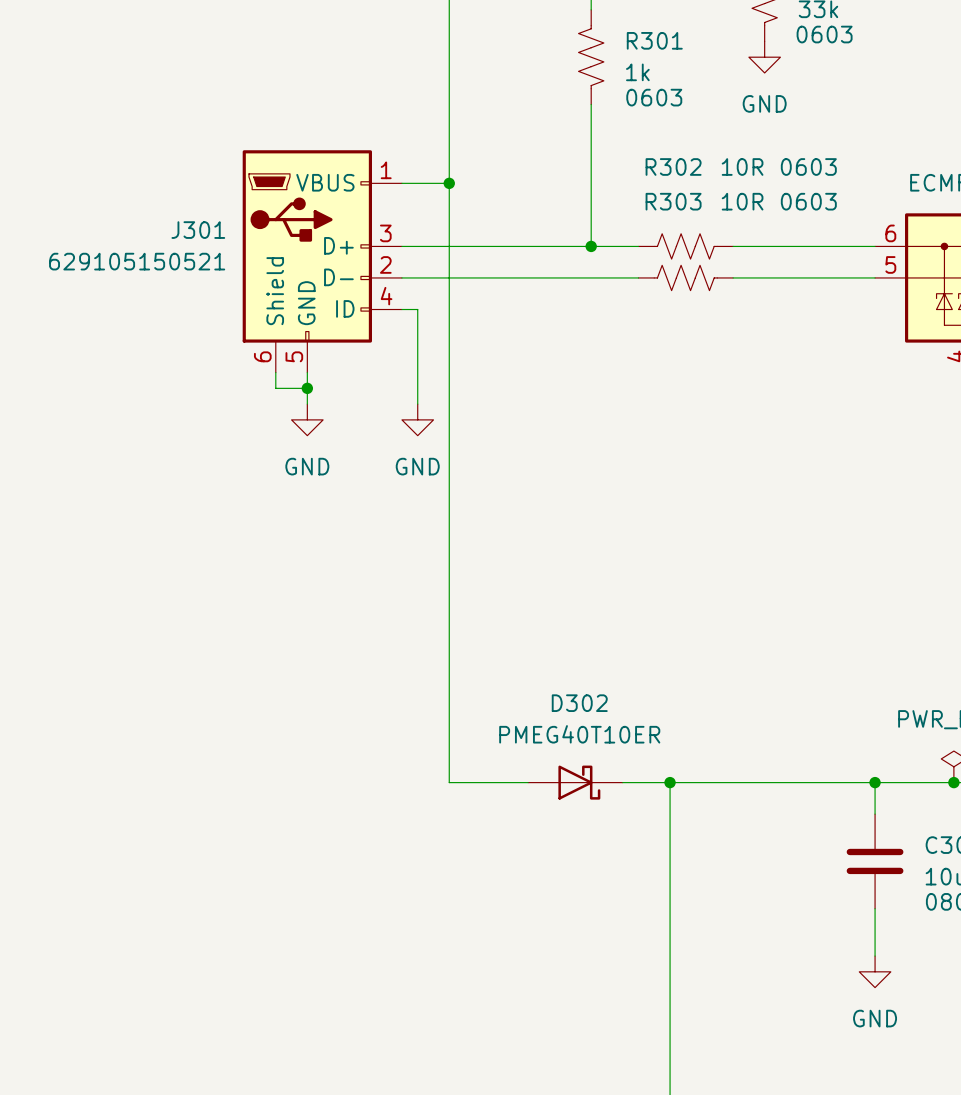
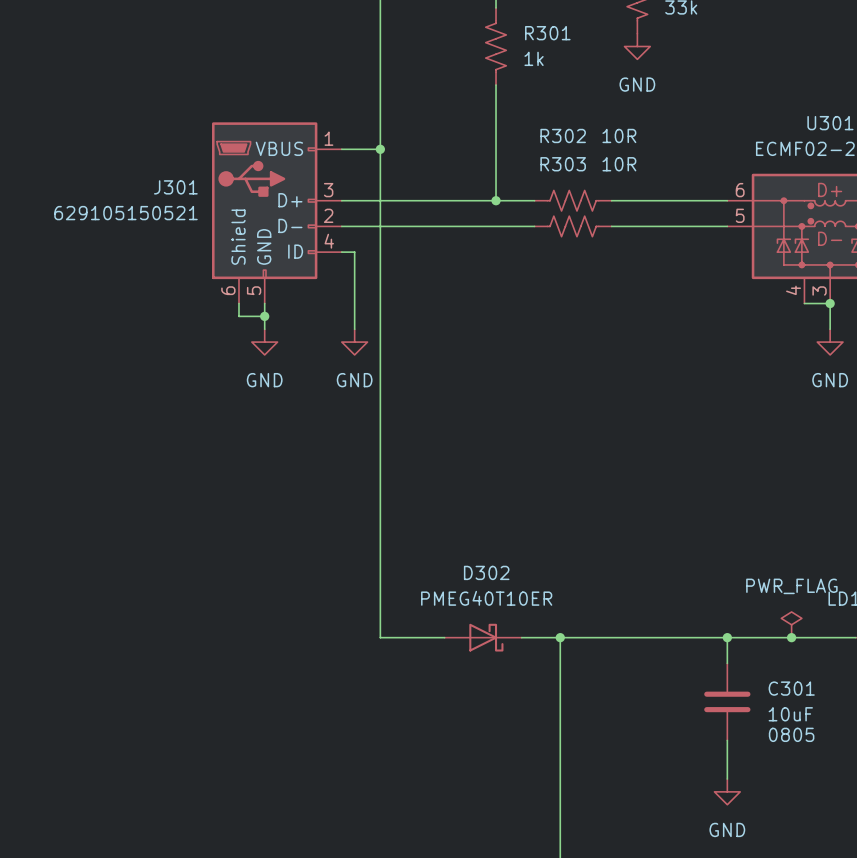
part text: 0603 (824, 34) -> none
R301 text: 0603 (654, 97) -> none
R302 text: 0603 (808, 166) -> none
R303 text: 0603 (808, 201) -> none

